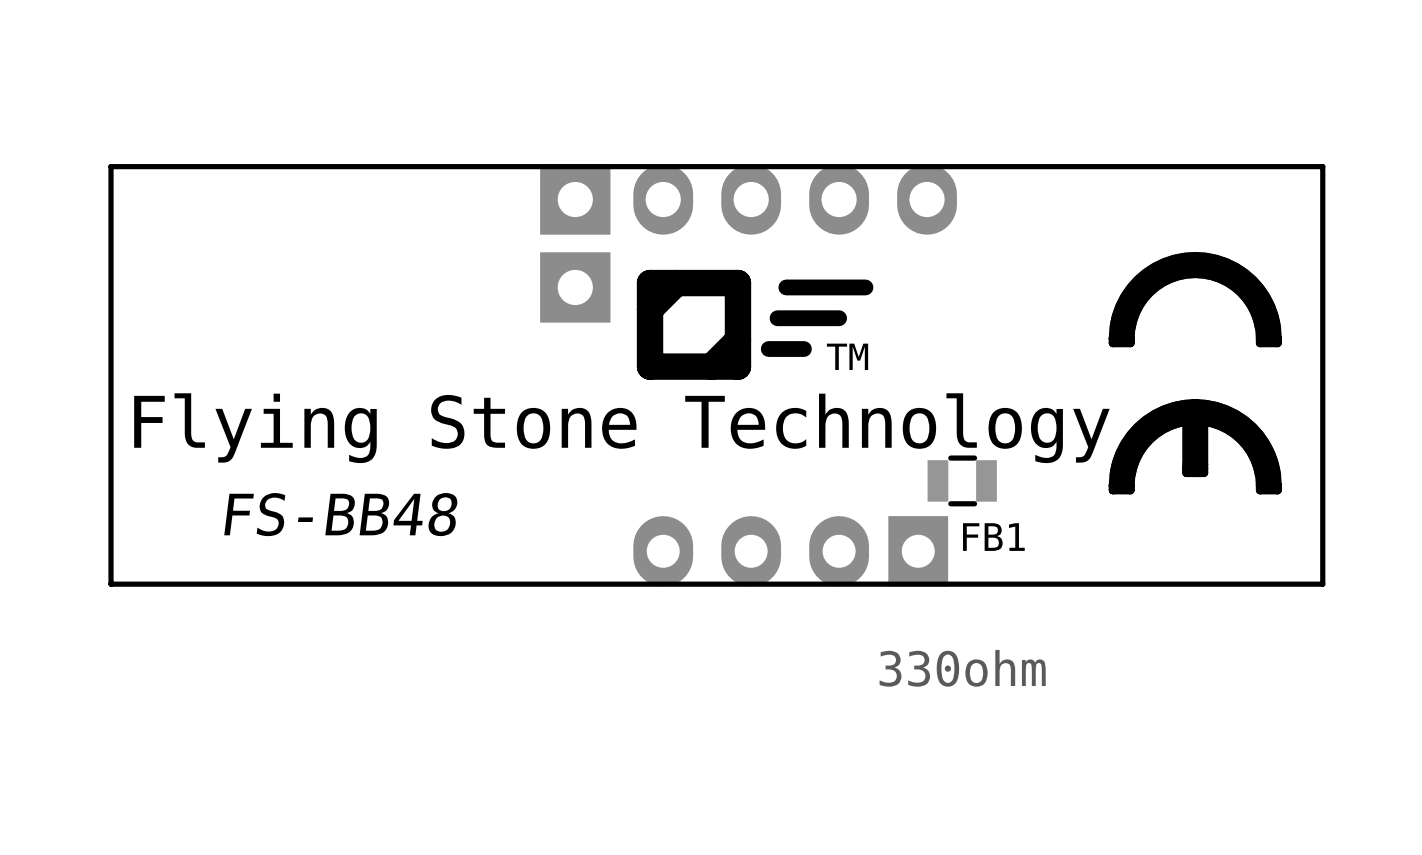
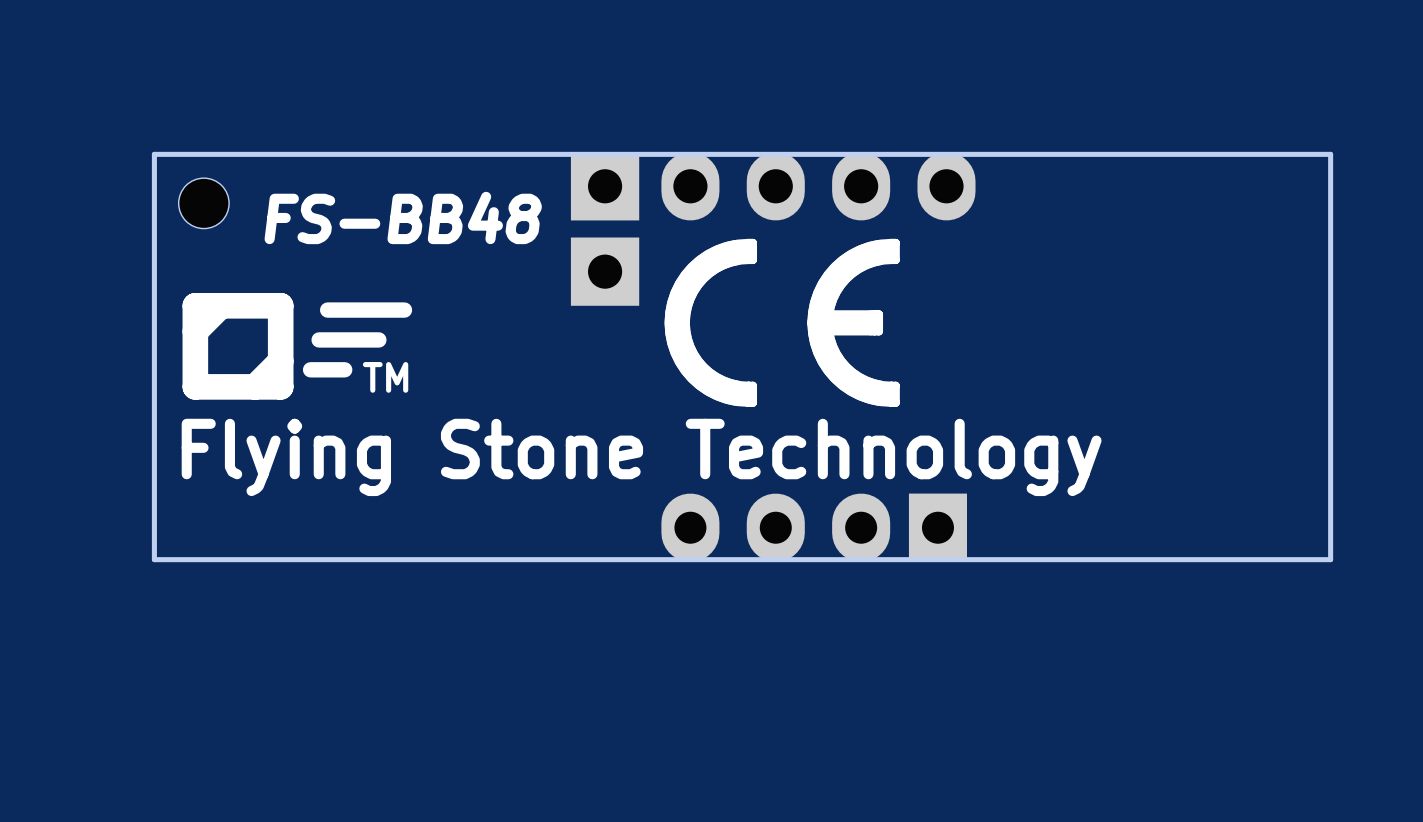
part: none -> (203, 203)
drawing: [1108, 252, 1282, 495] -> none
drawing: none -> [664, 238, 900, 407]
drawing position: (755, 324) -> (297, 346)
text position: Flying Stone Technology (621, 428) -> Flying Stone Technology (641, 457)
FB1: 330ohm (962, 480) -> none
text position: FS-BB48 (341, 514) -> FS-BB48 (403, 217)

